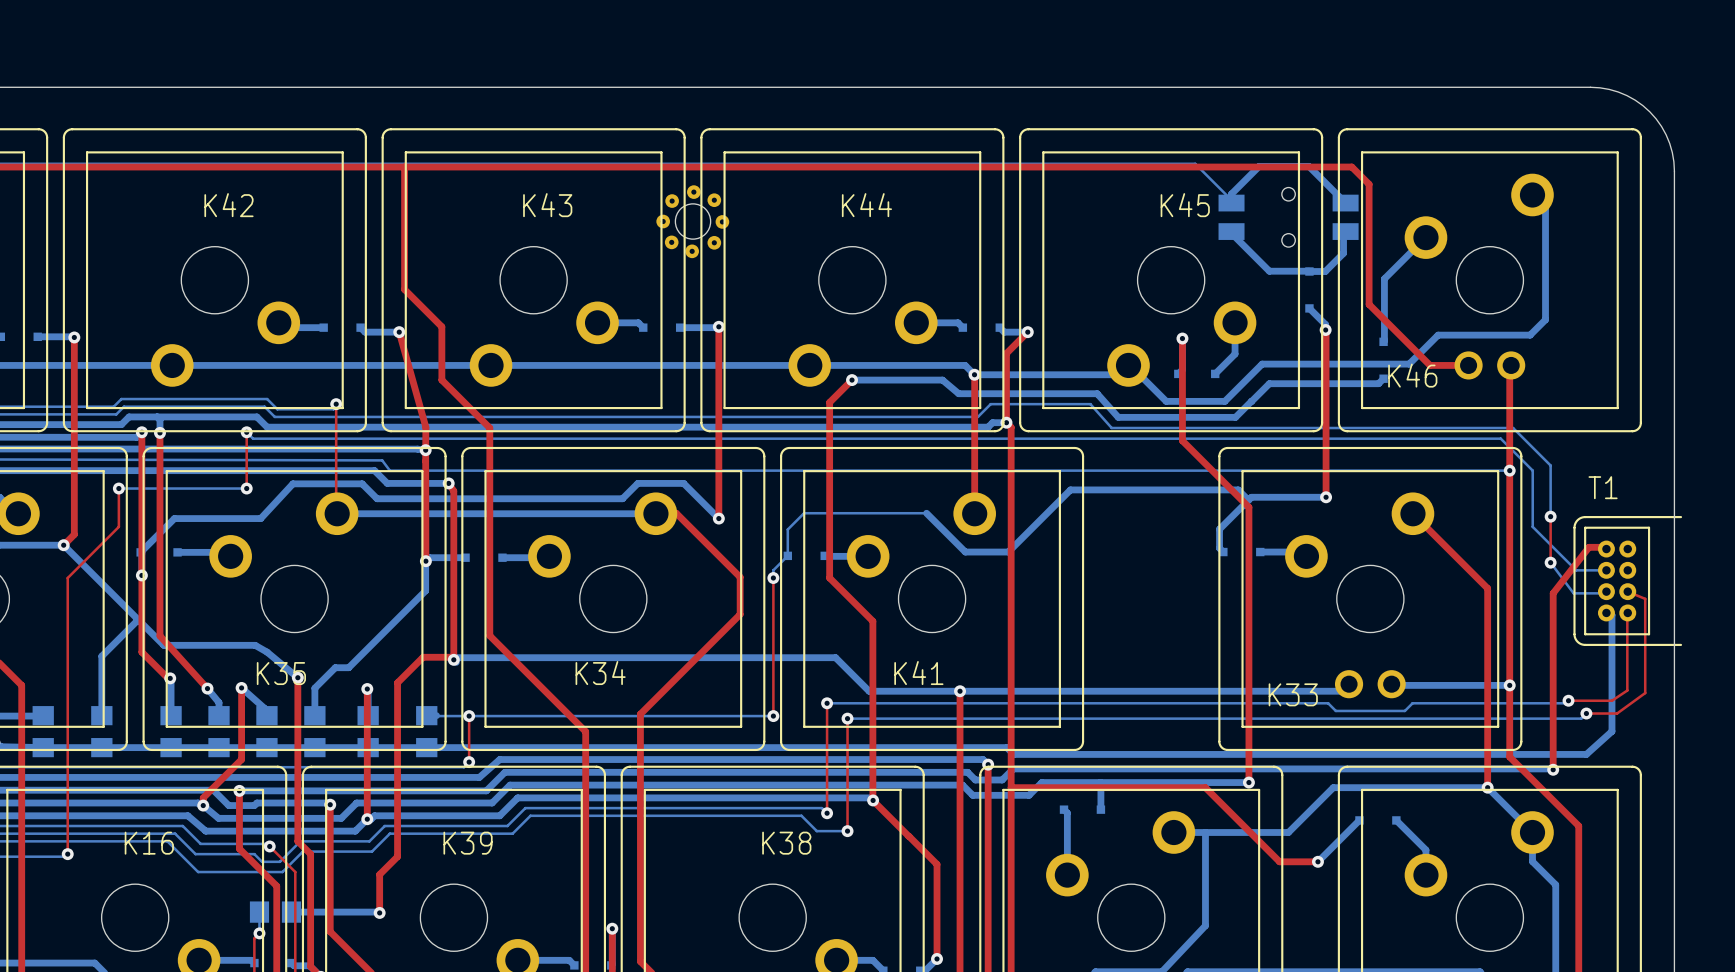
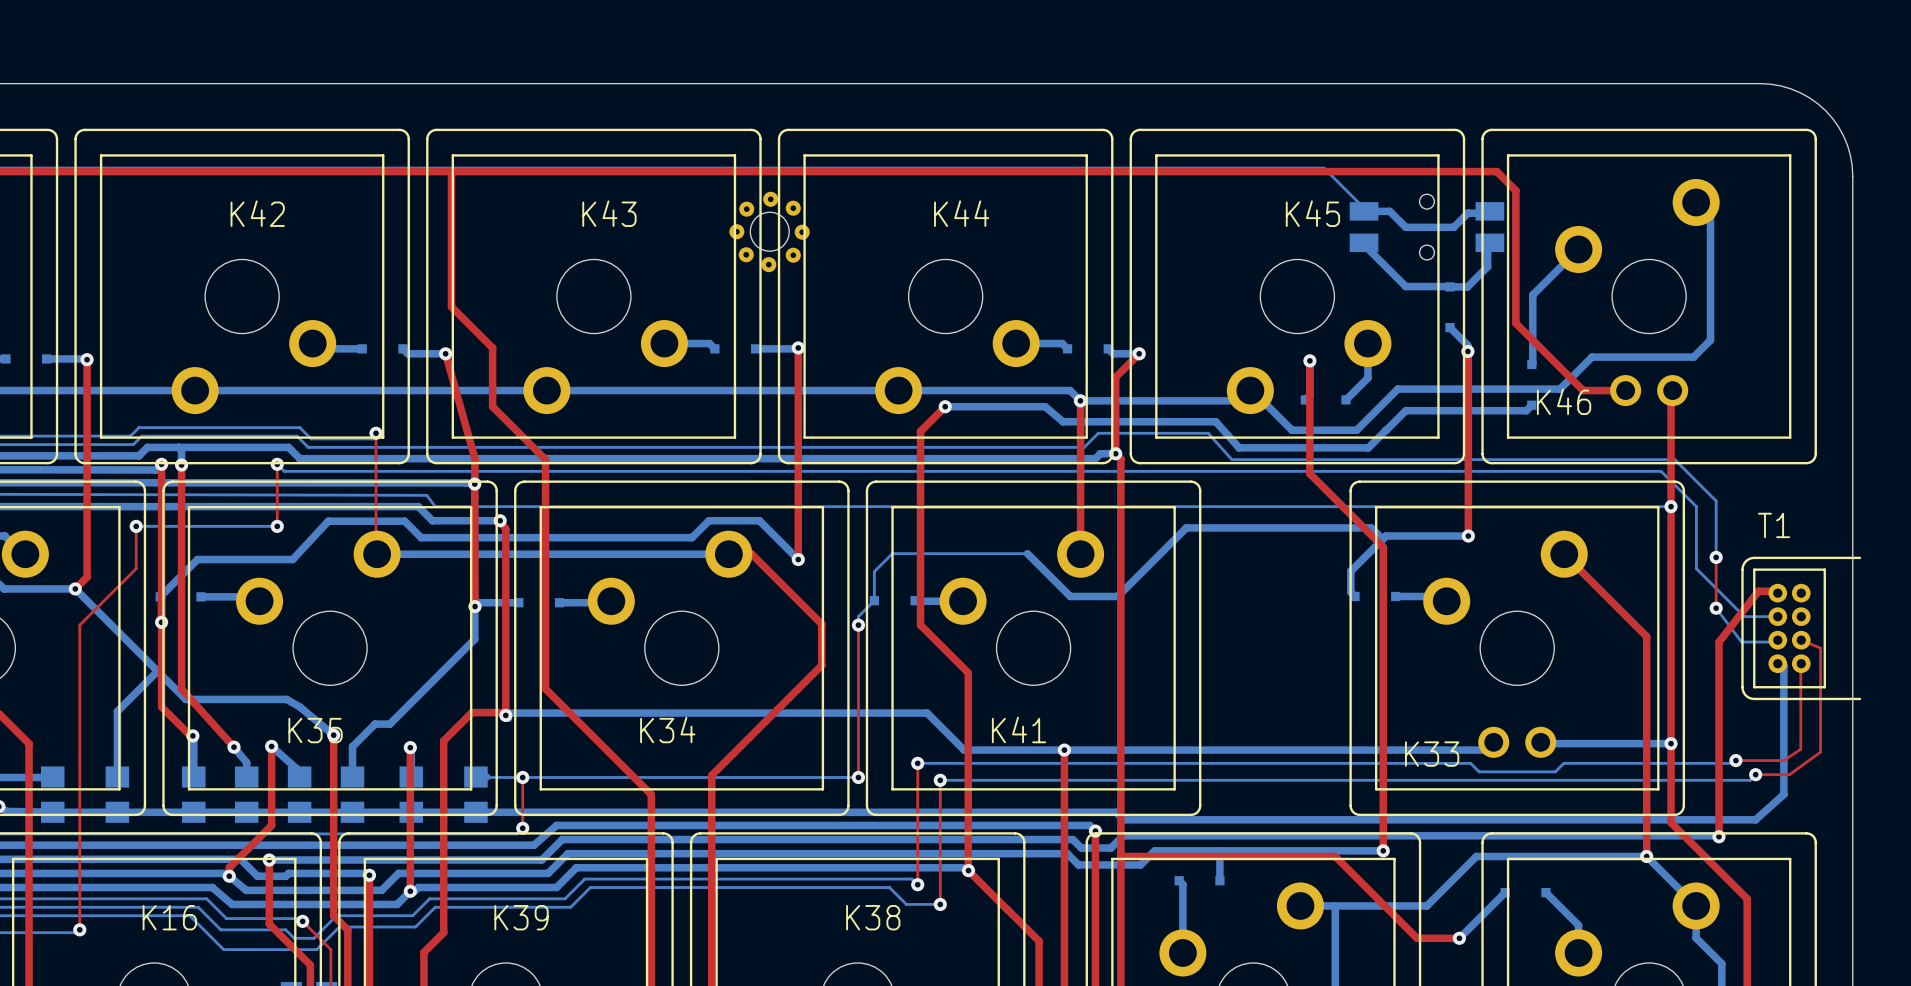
bottom track: (1231, 203) (1231, 194) (1259, 166) (1308, 166) (1345, 203) -> (1364, 211) (1389, 211) (1405, 227) (1453, 227) (1467, 213) (1488, 213)

